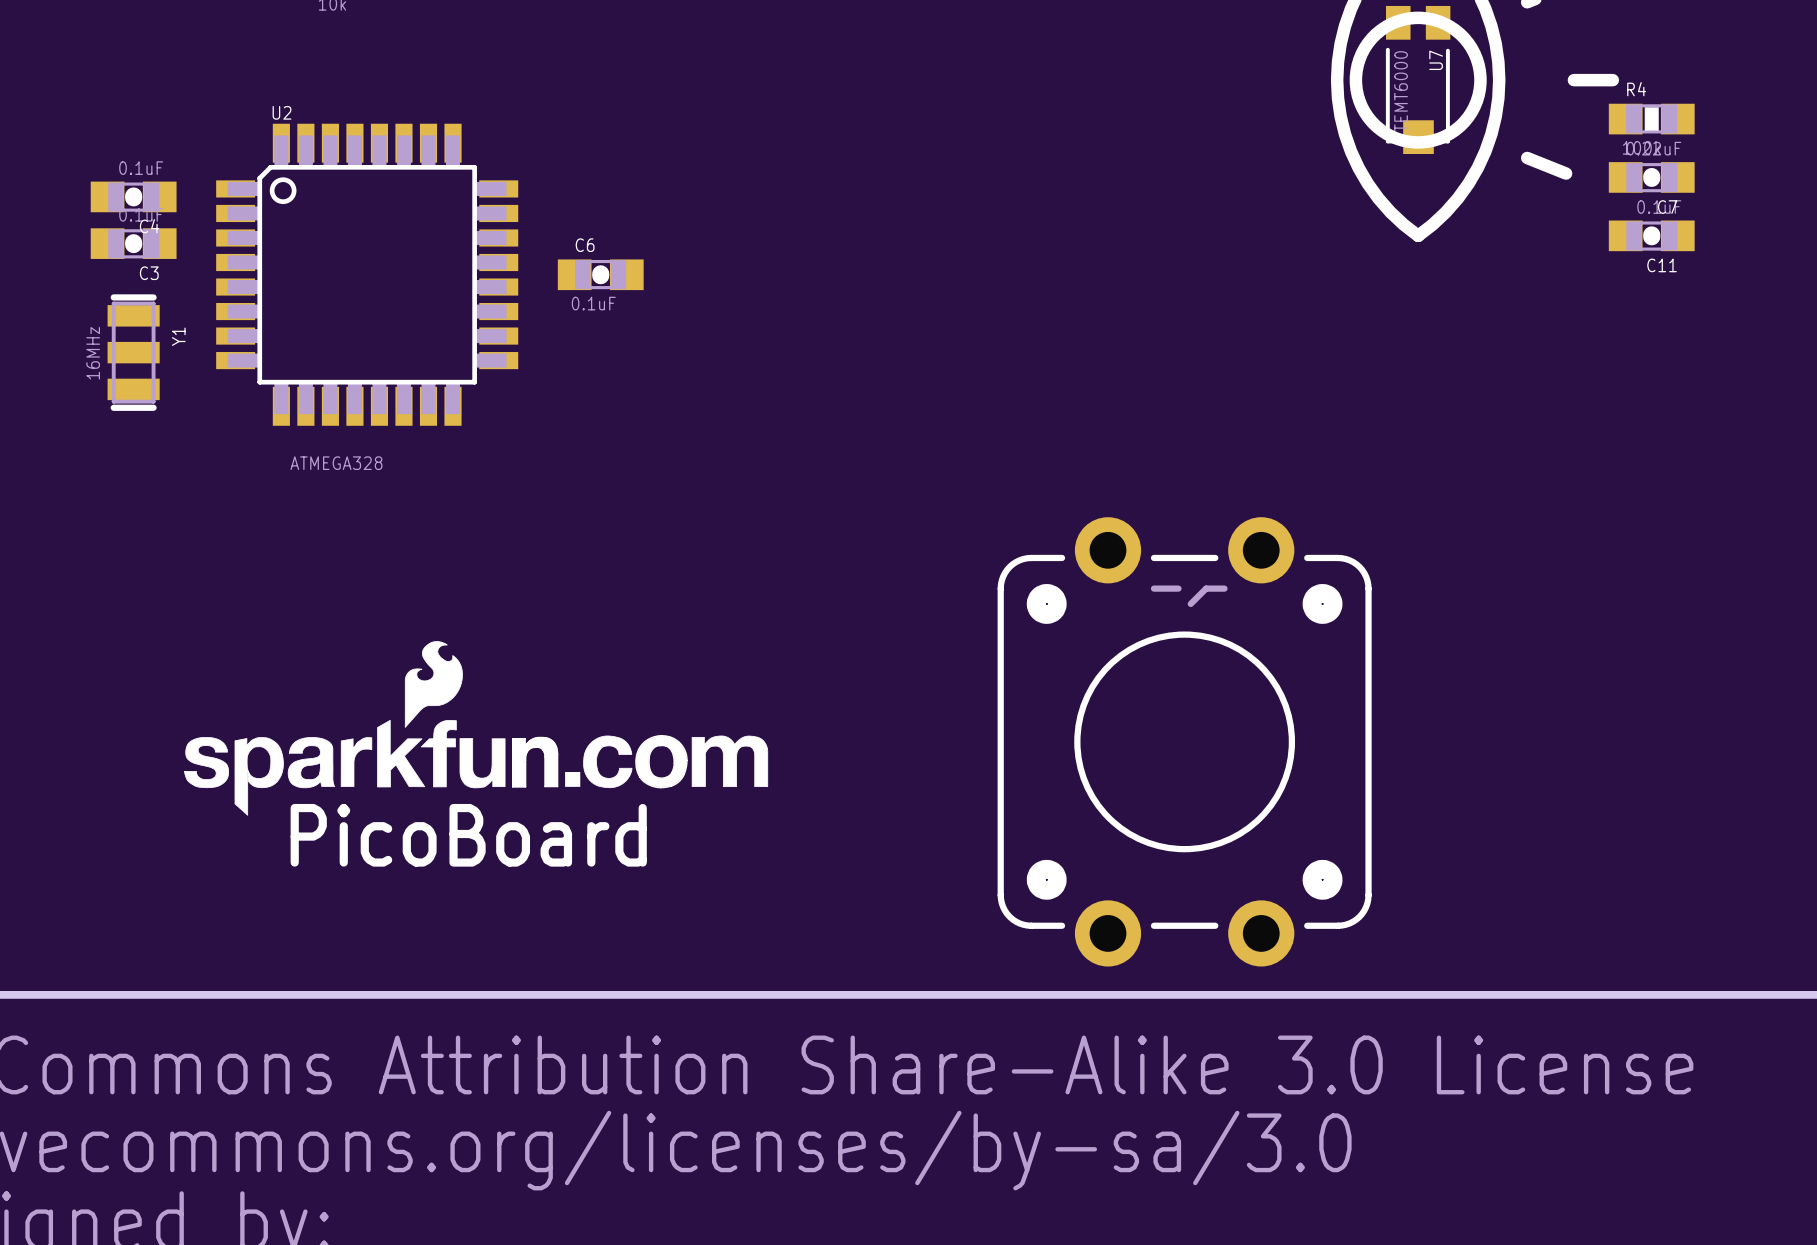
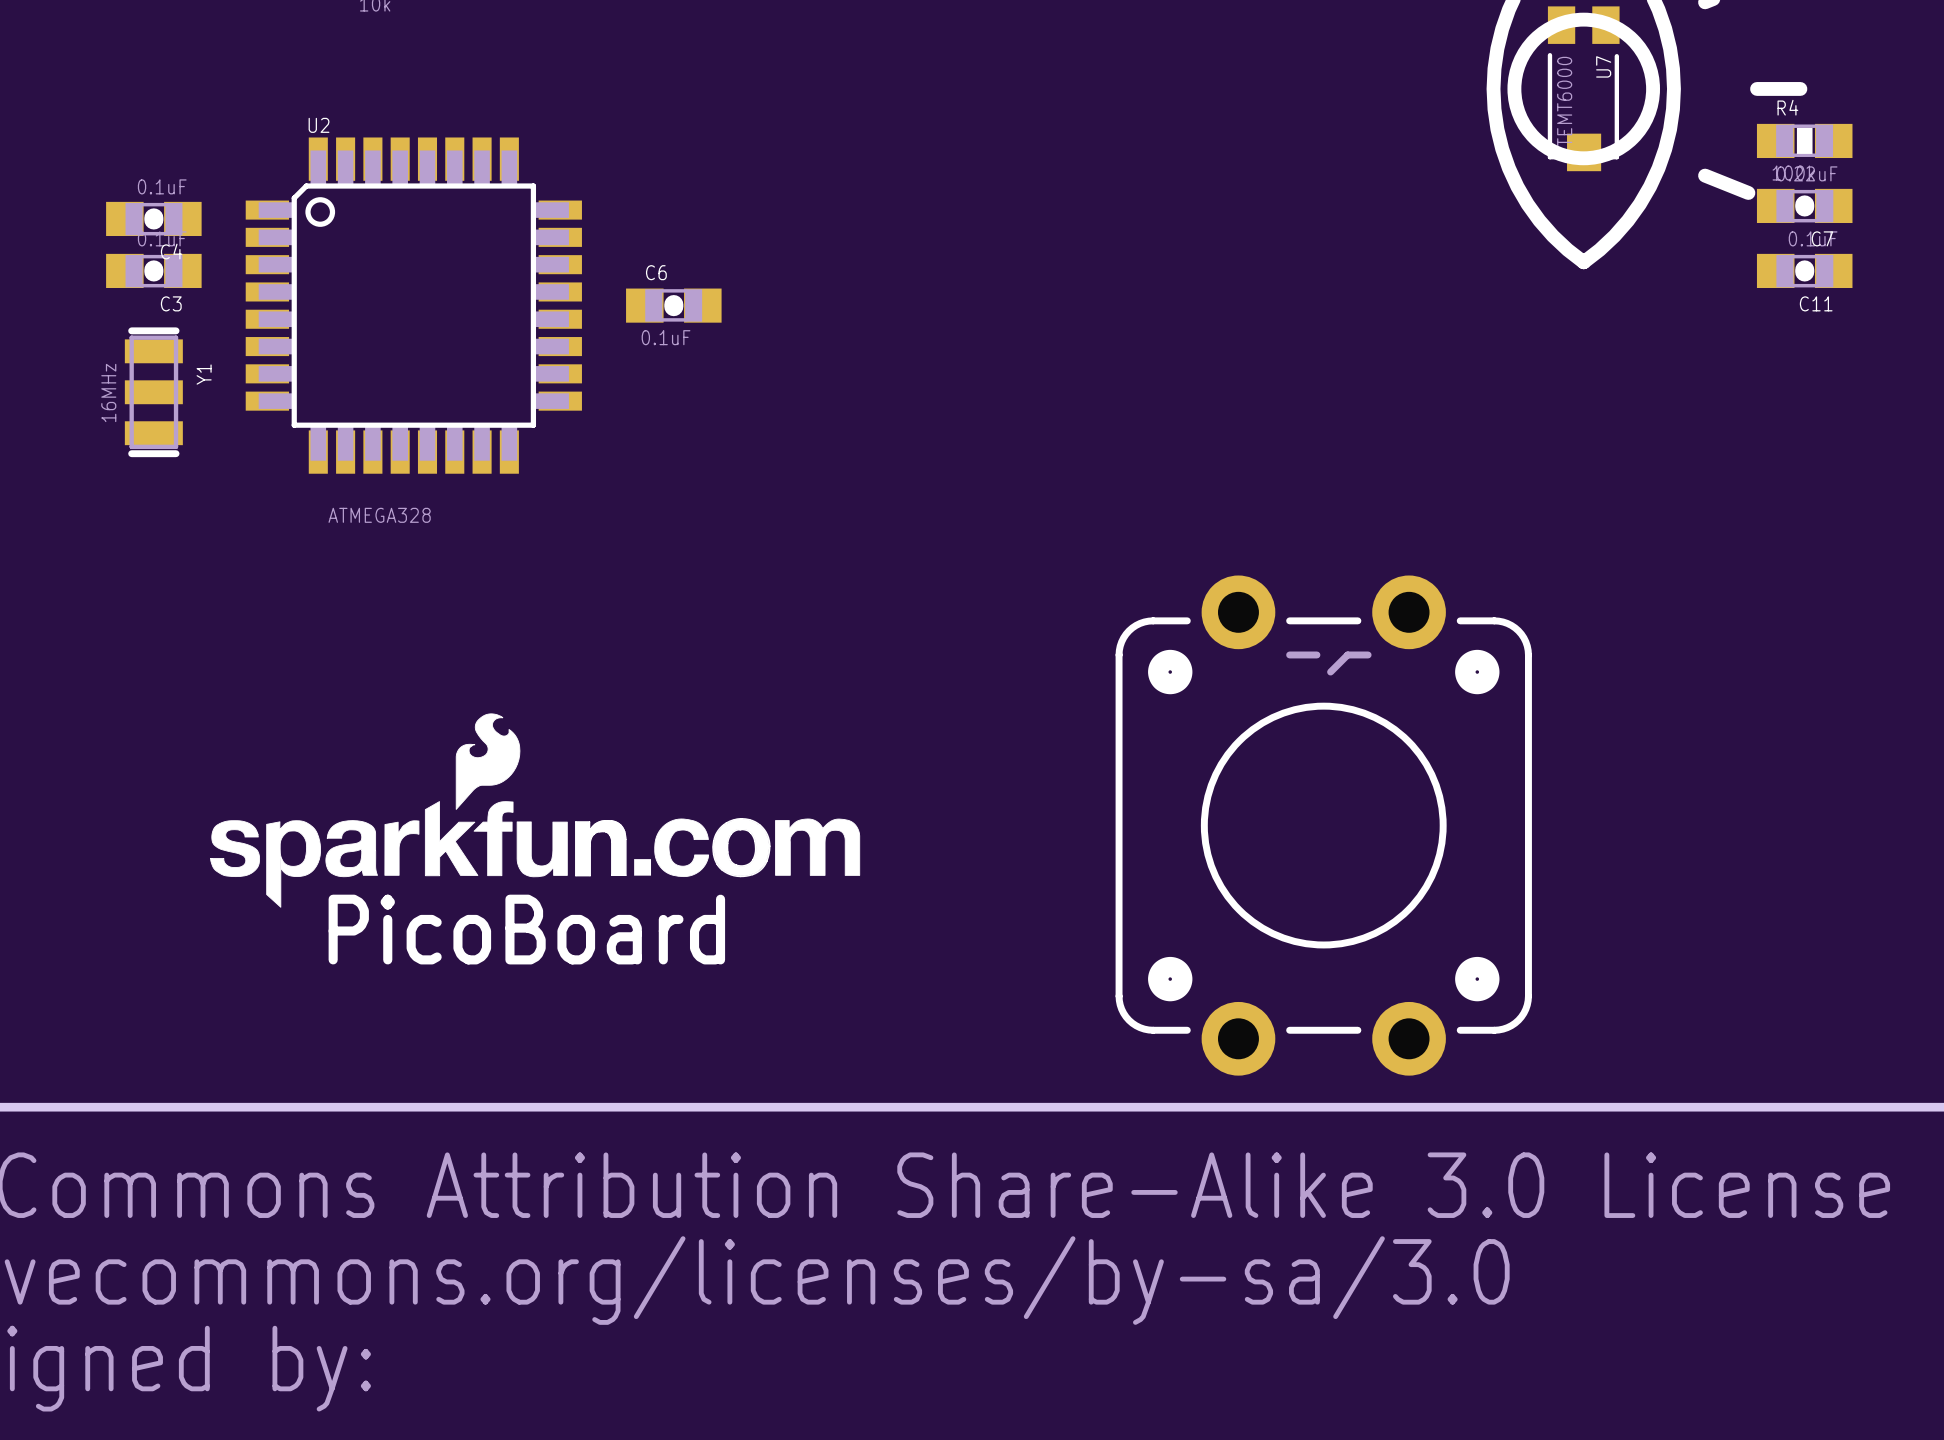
R4 position: (1651, 119) -> (1804, 140)
C7 position: (1651, 177) -> (1804, 205)
C11 position: (1651, 235) -> (1804, 270)

